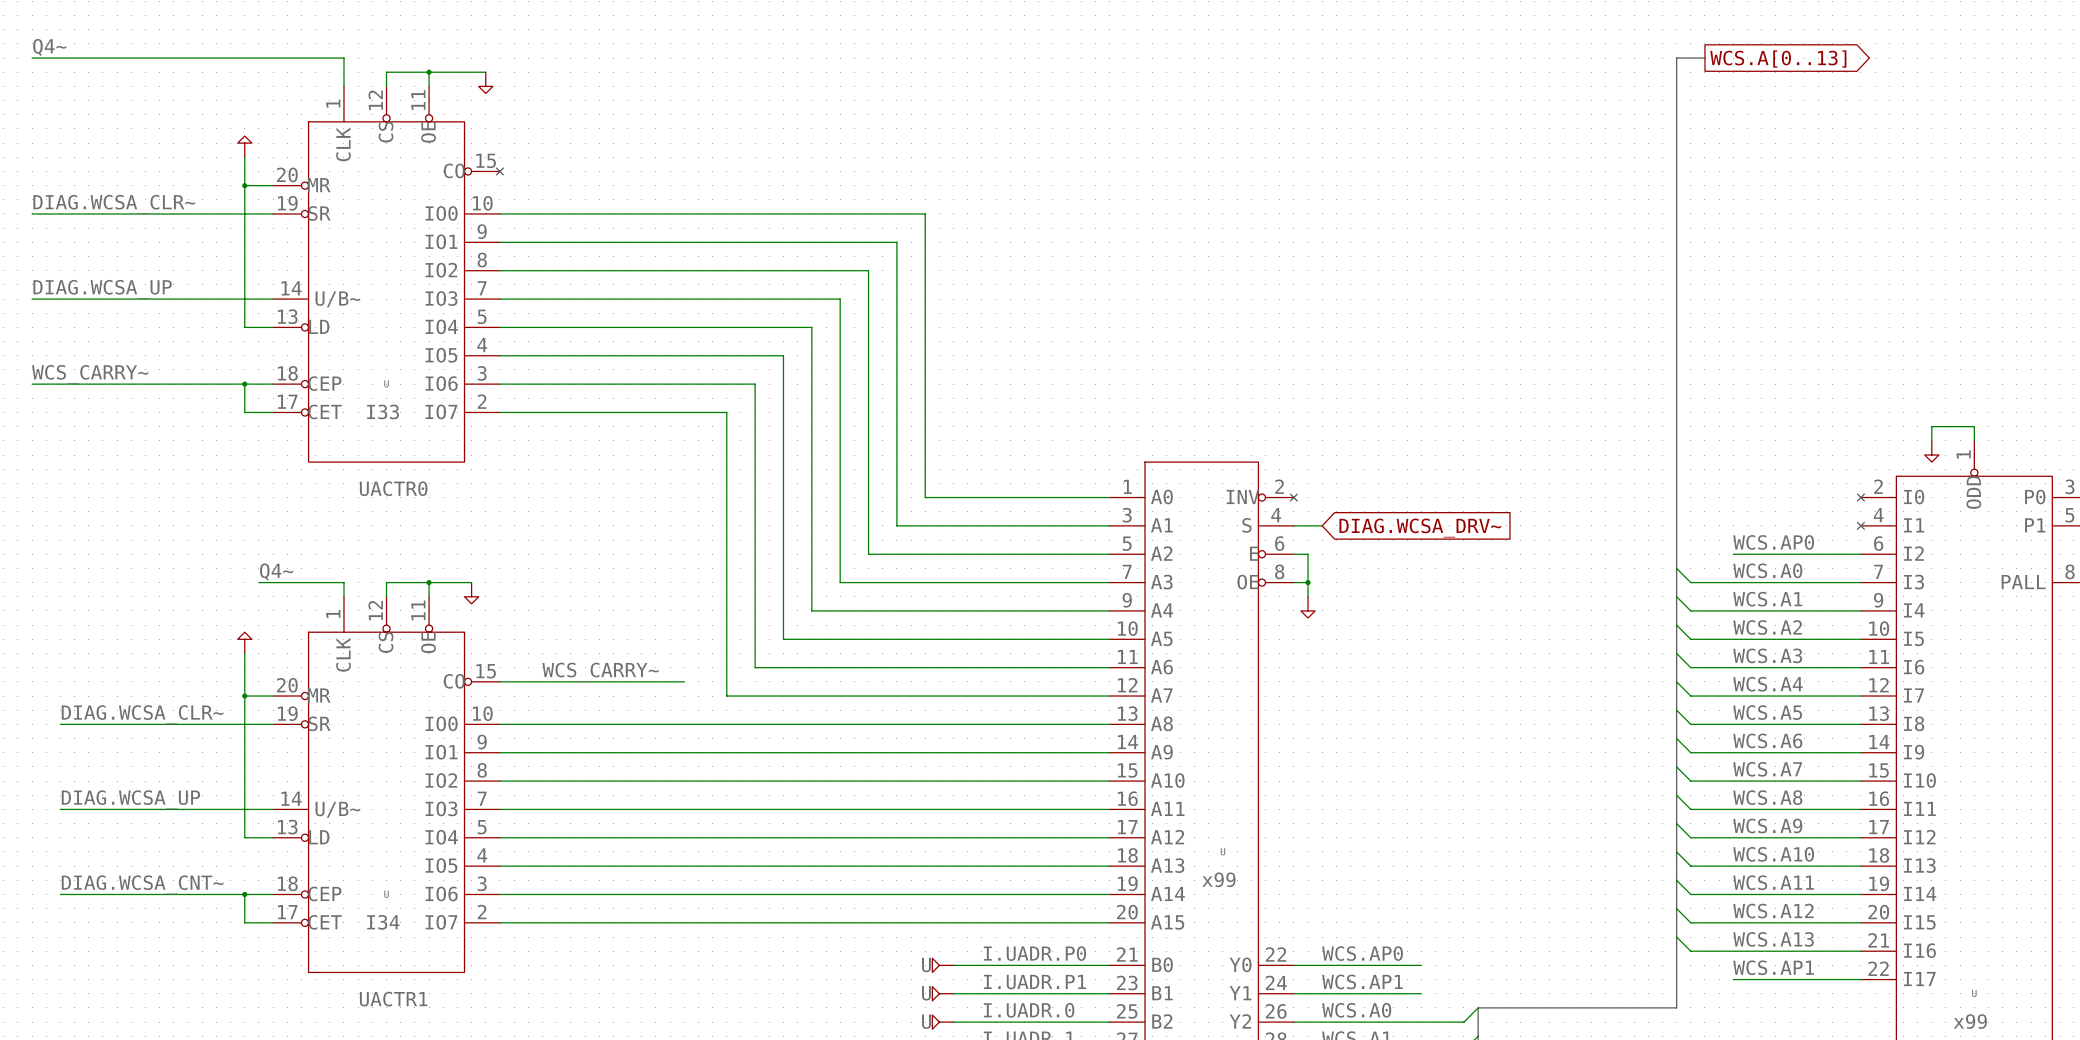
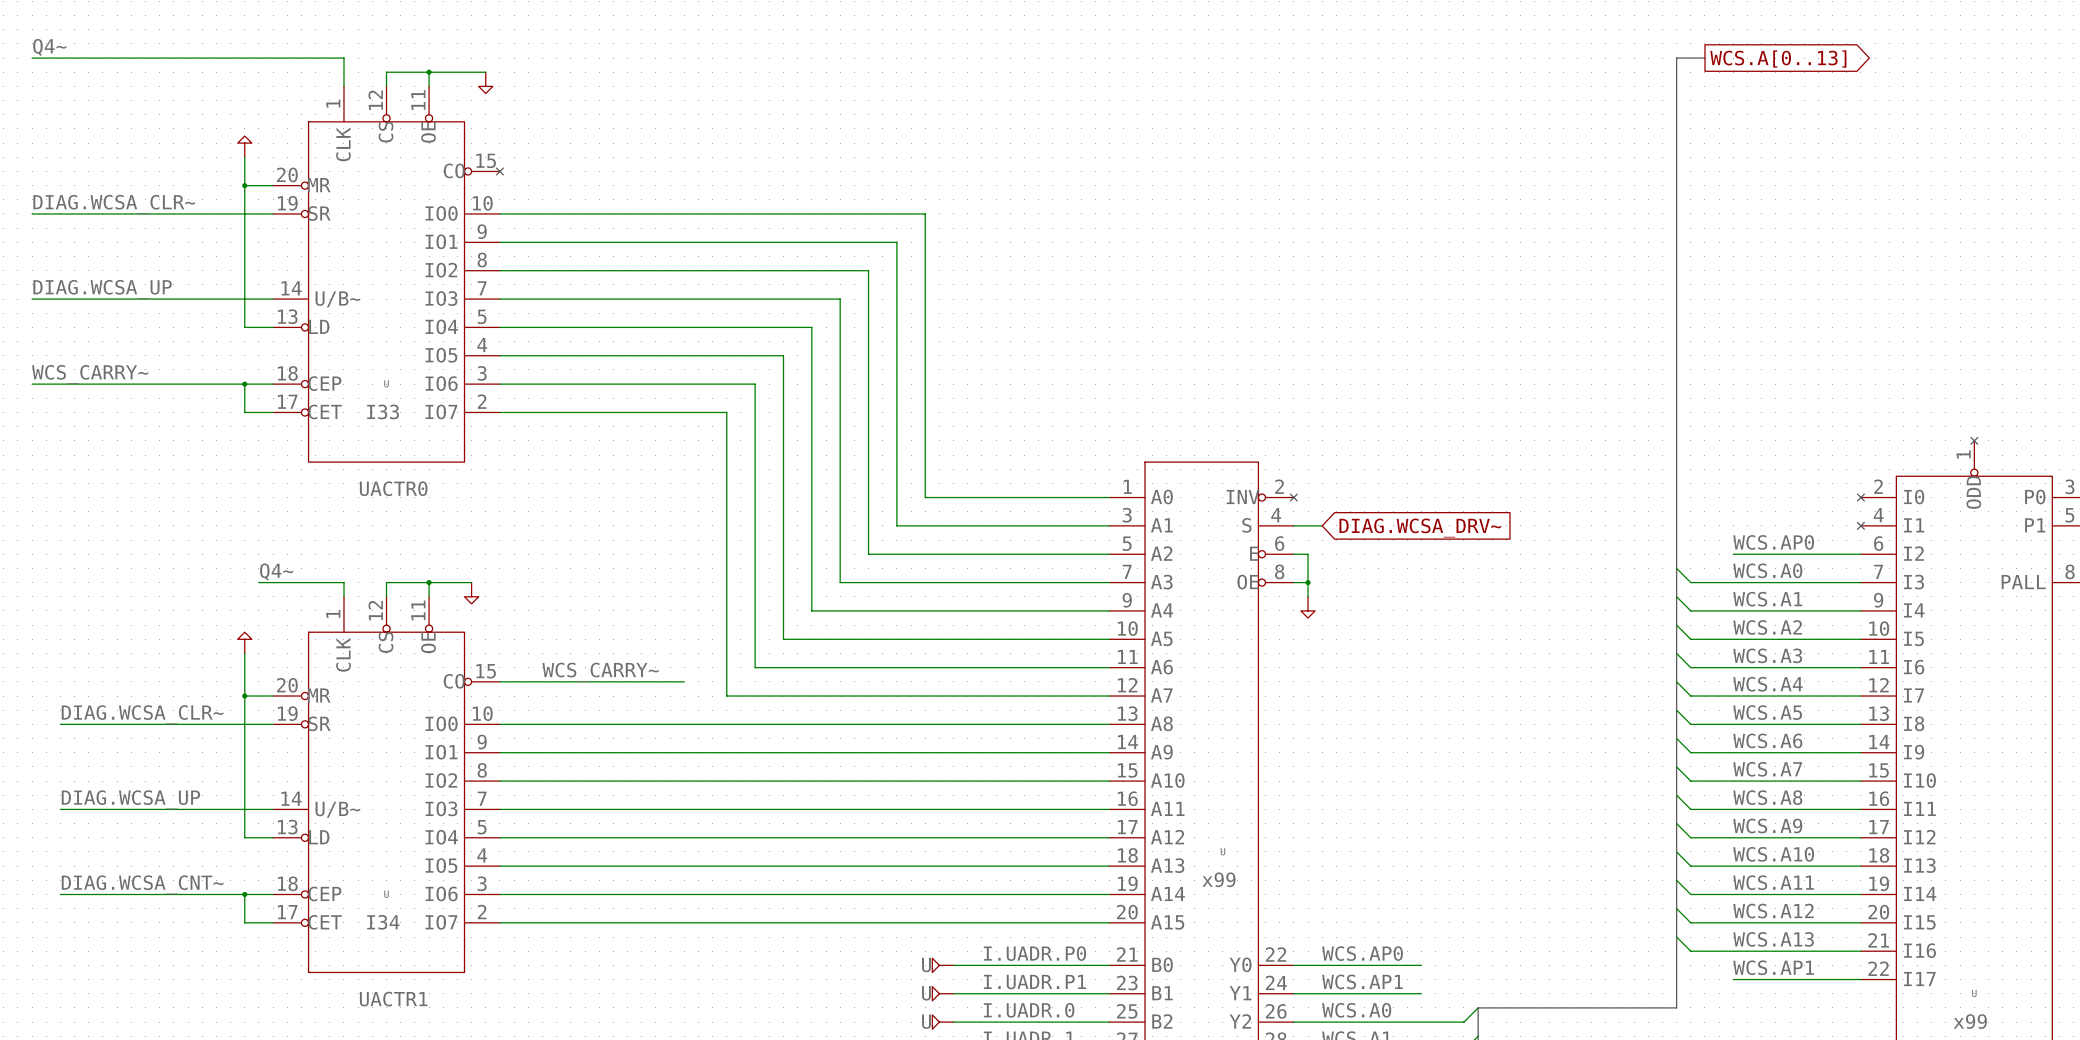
wire: (1931, 440) (1931, 426) (1974, 426) (1974, 440) -> none
no-connect mark: none -> (1974, 440)
power symbol: (1931, 451) -> none

